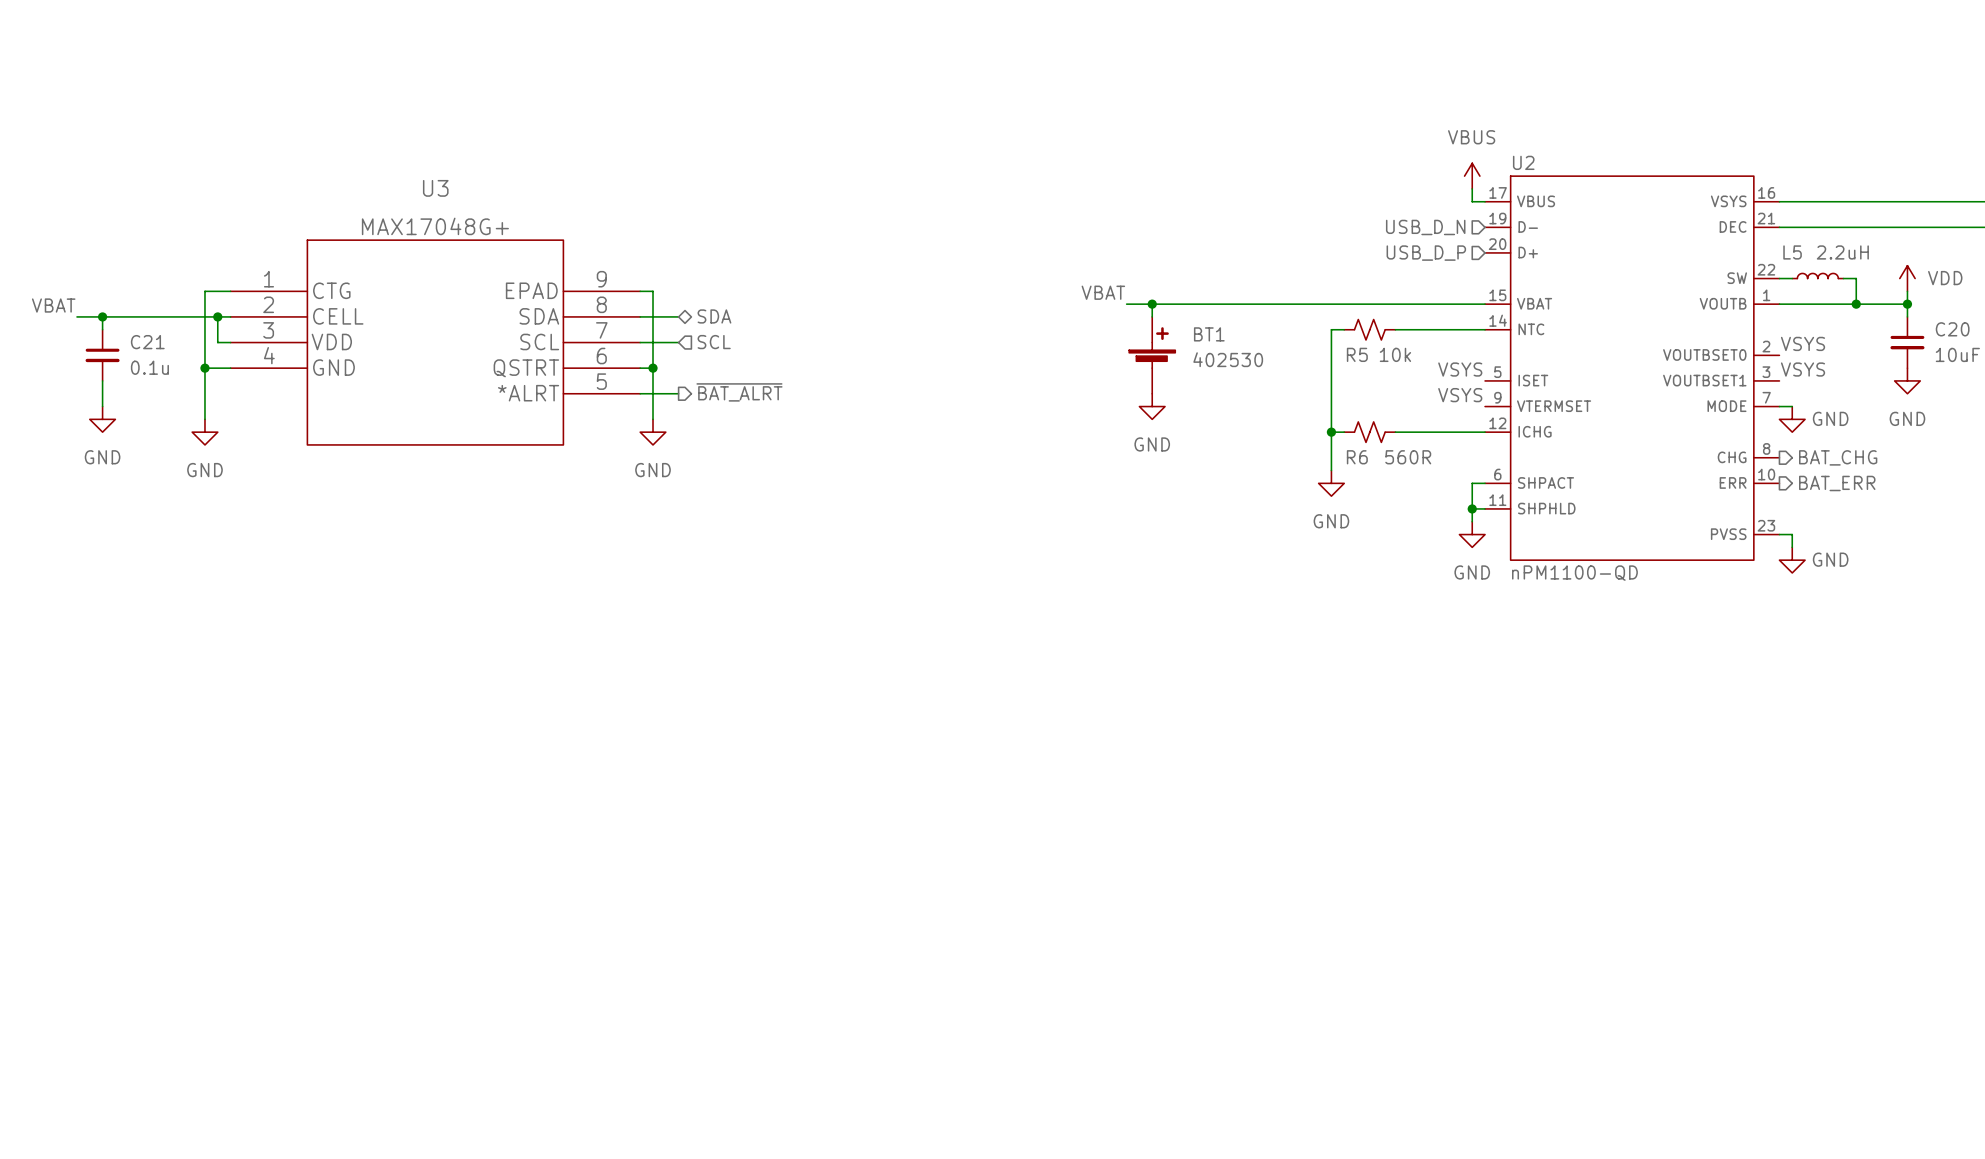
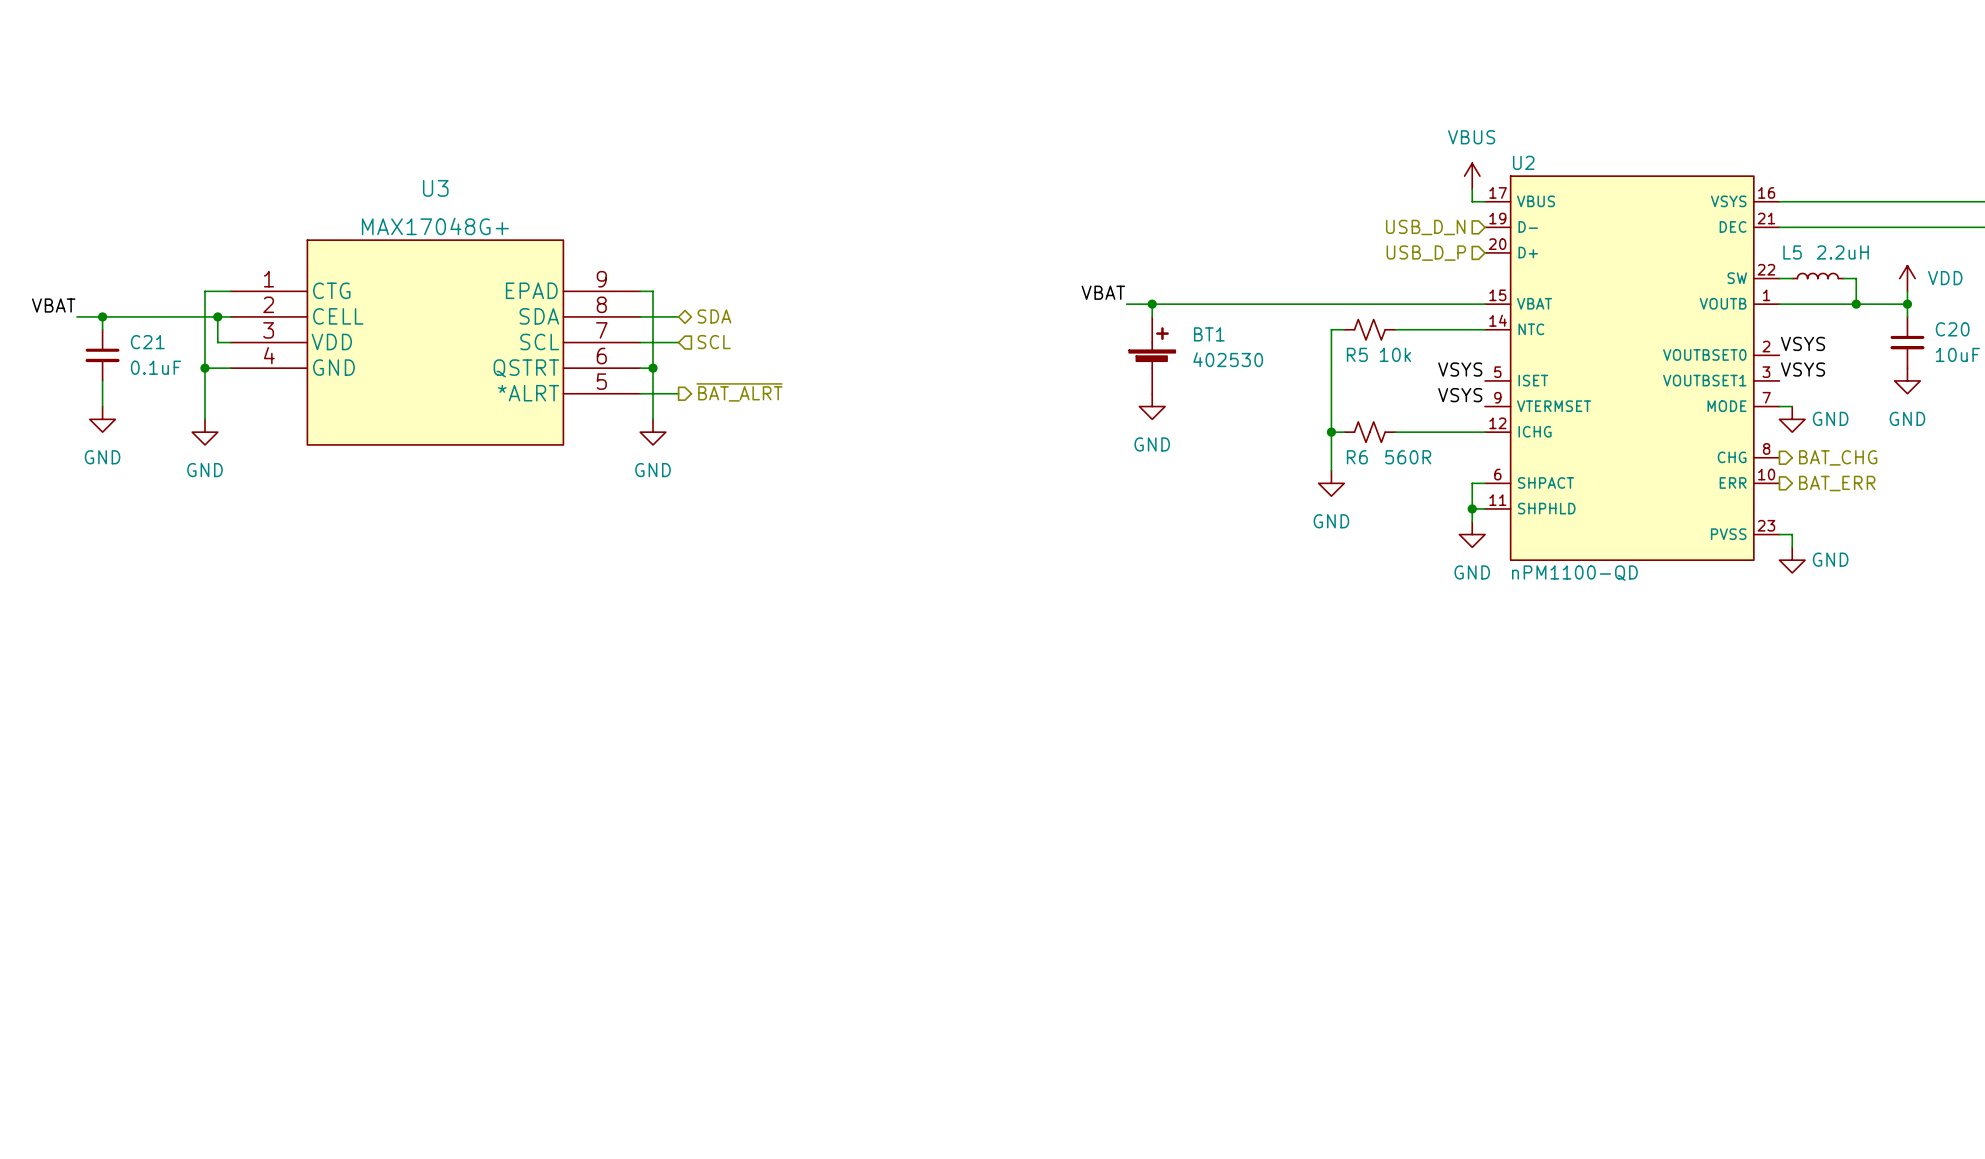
C21 value: 0.1u (149, 367) -> 0.1uF (156, 367)

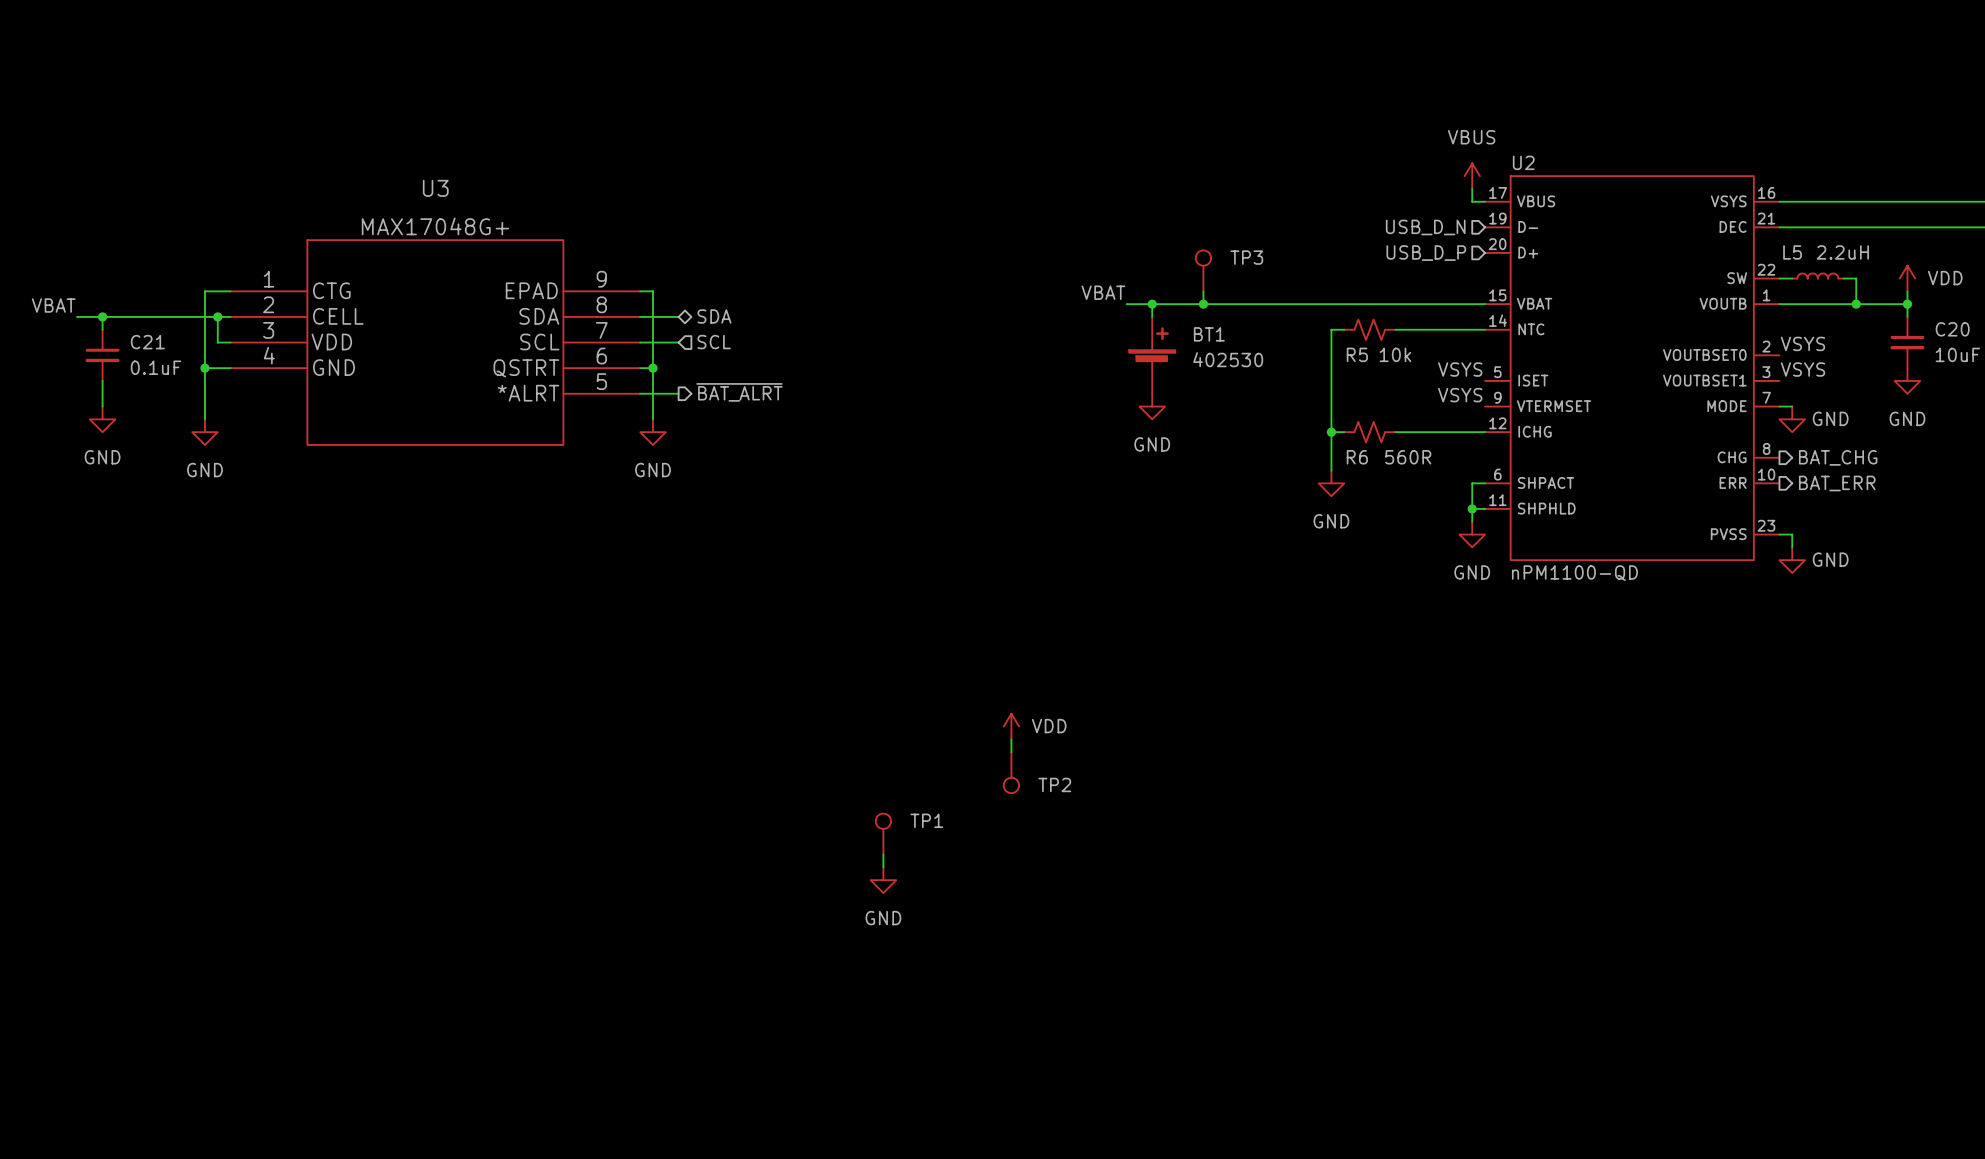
TP3: none -> (1203, 270)
wire: none -> (1203, 291) (1203, 304)
junction: none -> (1203, 304)
power symbol: none -> VDD (1011, 726)
wire: none -> (1011, 739) (1011, 752)
TP2: none -> (1011, 772)
TP1: none -> (883, 834)
wire: none -> (883, 854) (883, 867)
power symbol: none -> GND (883, 880)

